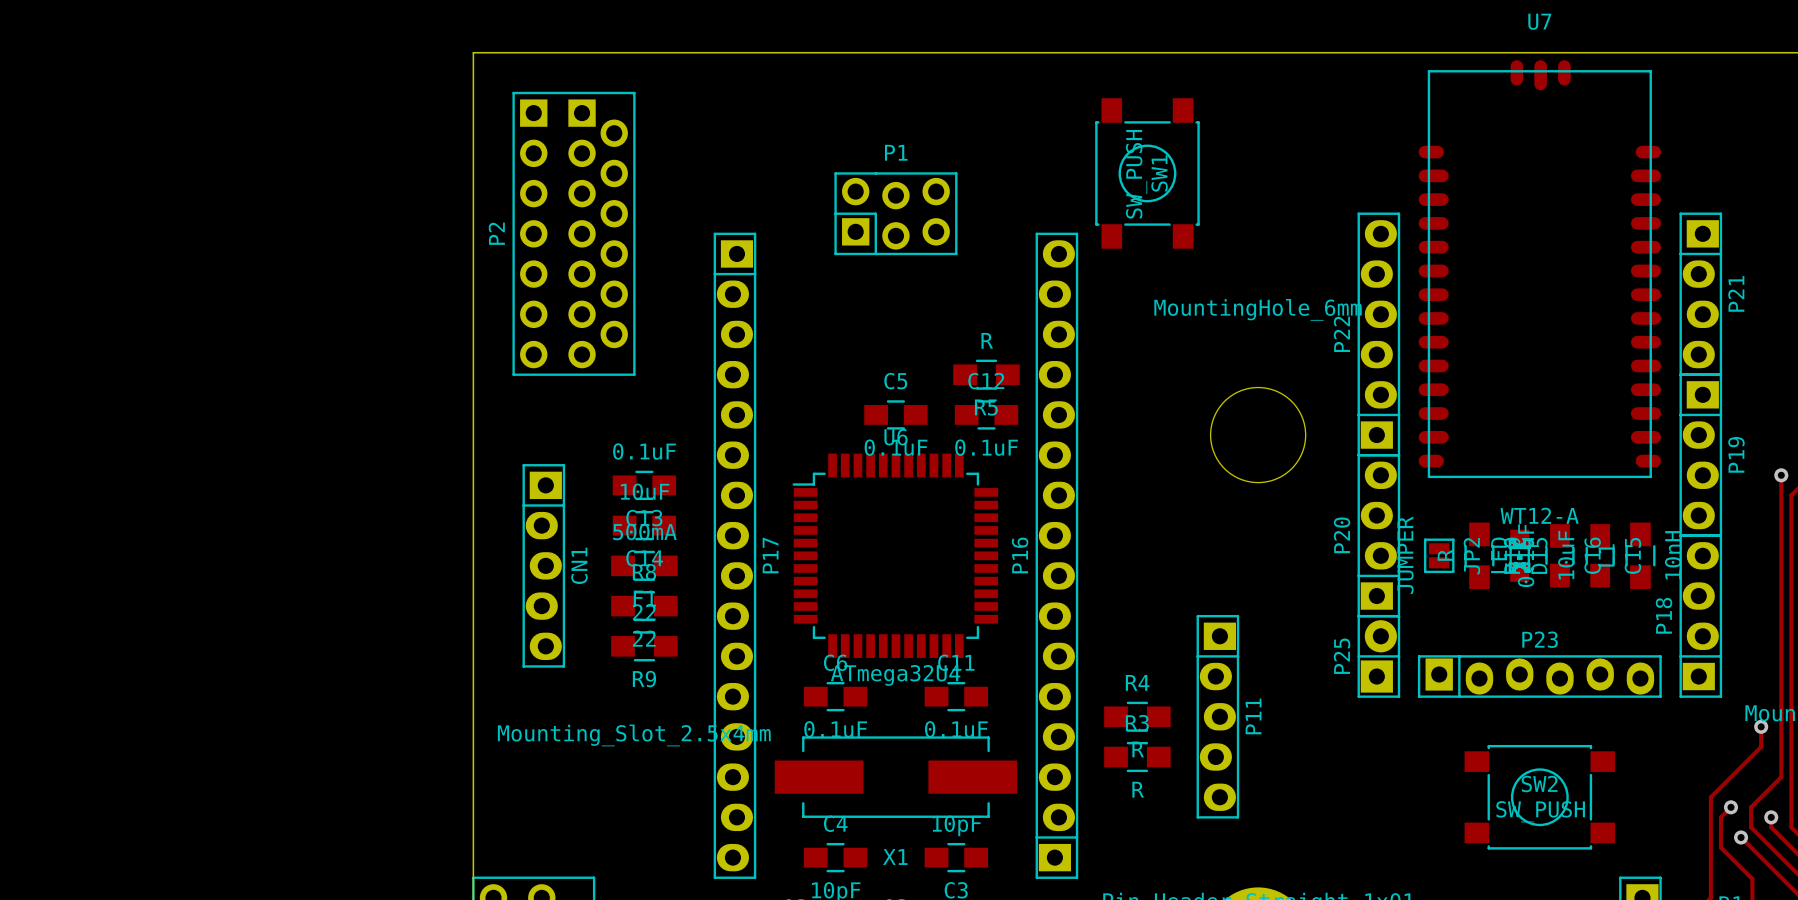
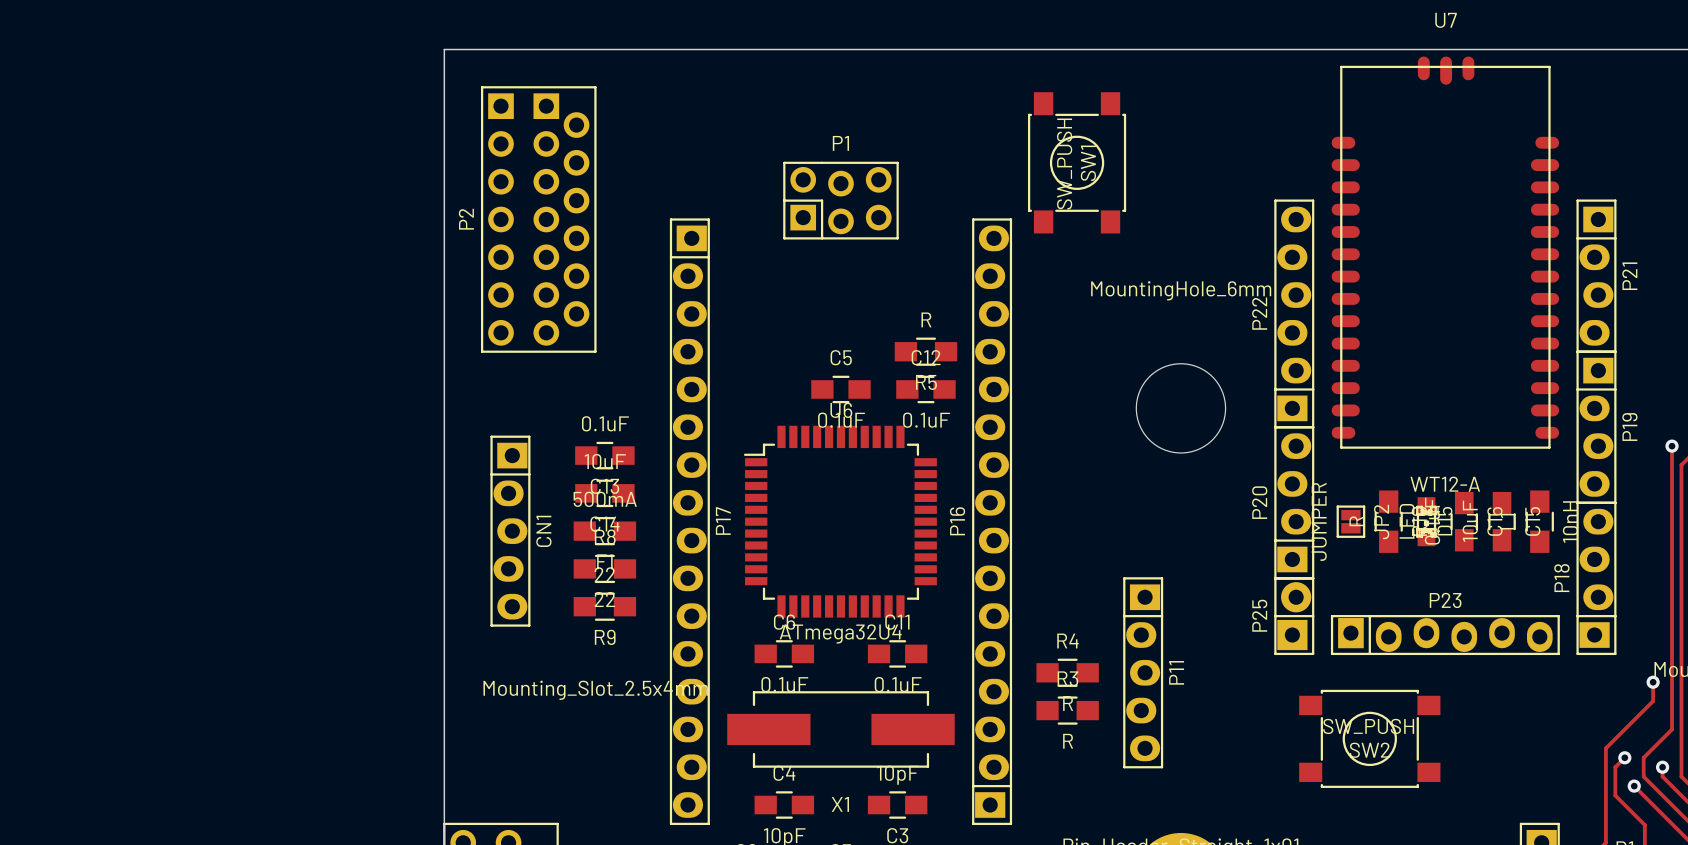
SW2 name position: SW2 (1539, 784) -> SW2 (1369, 750)
SW2 position: (1539, 797) -> (1369, 738)
SW2 value position: SW_PUSH (1540, 811) -> SW_PUSH (1368, 726)

